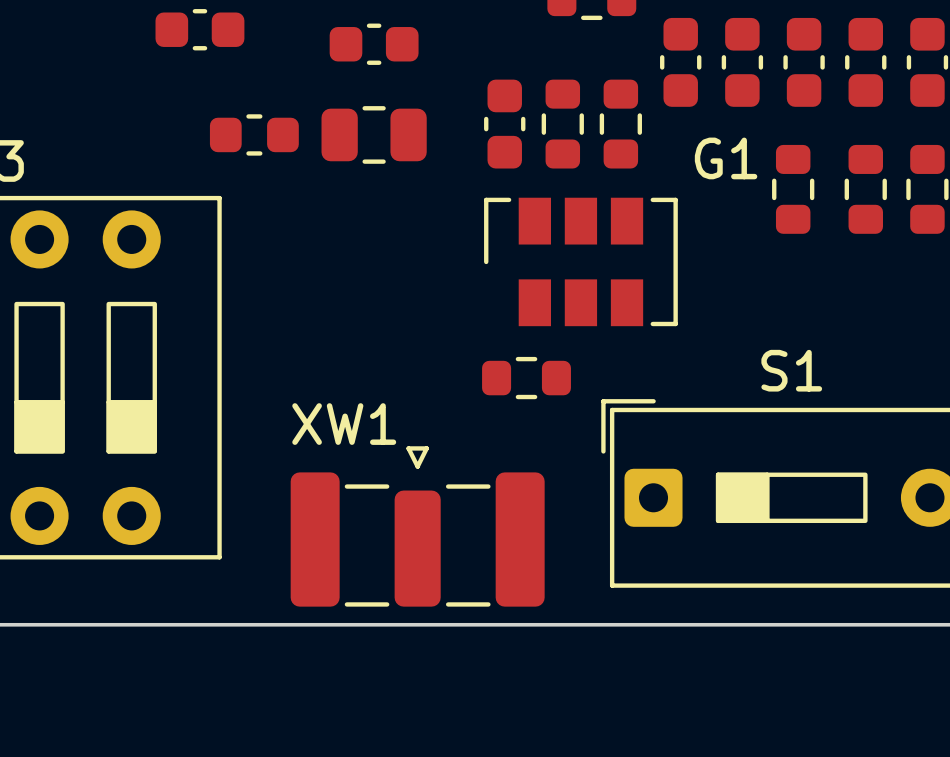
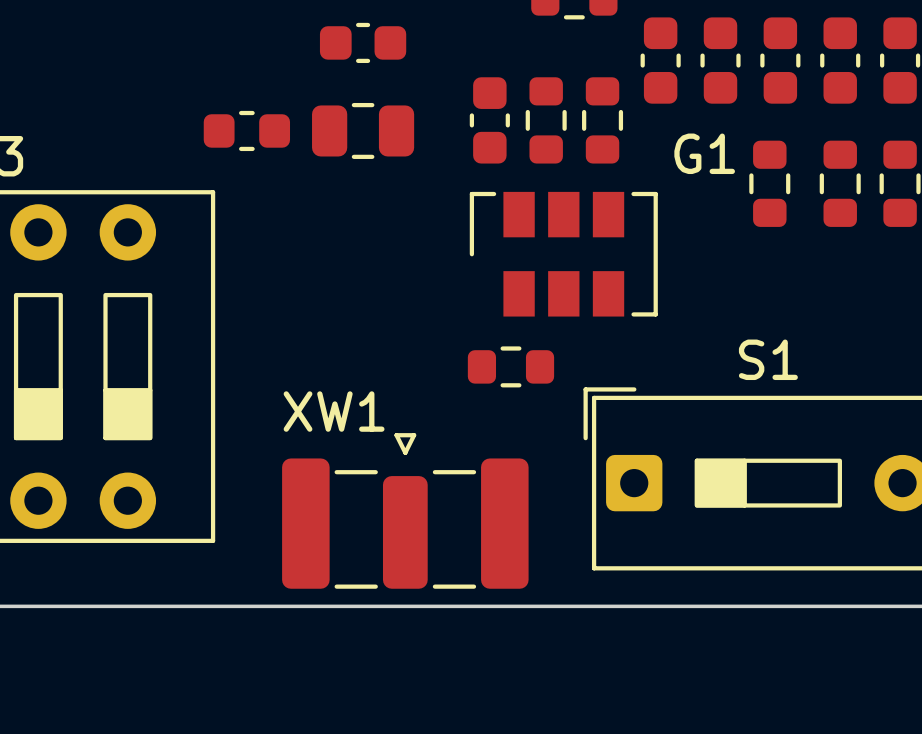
part: (199, 29) -> none

